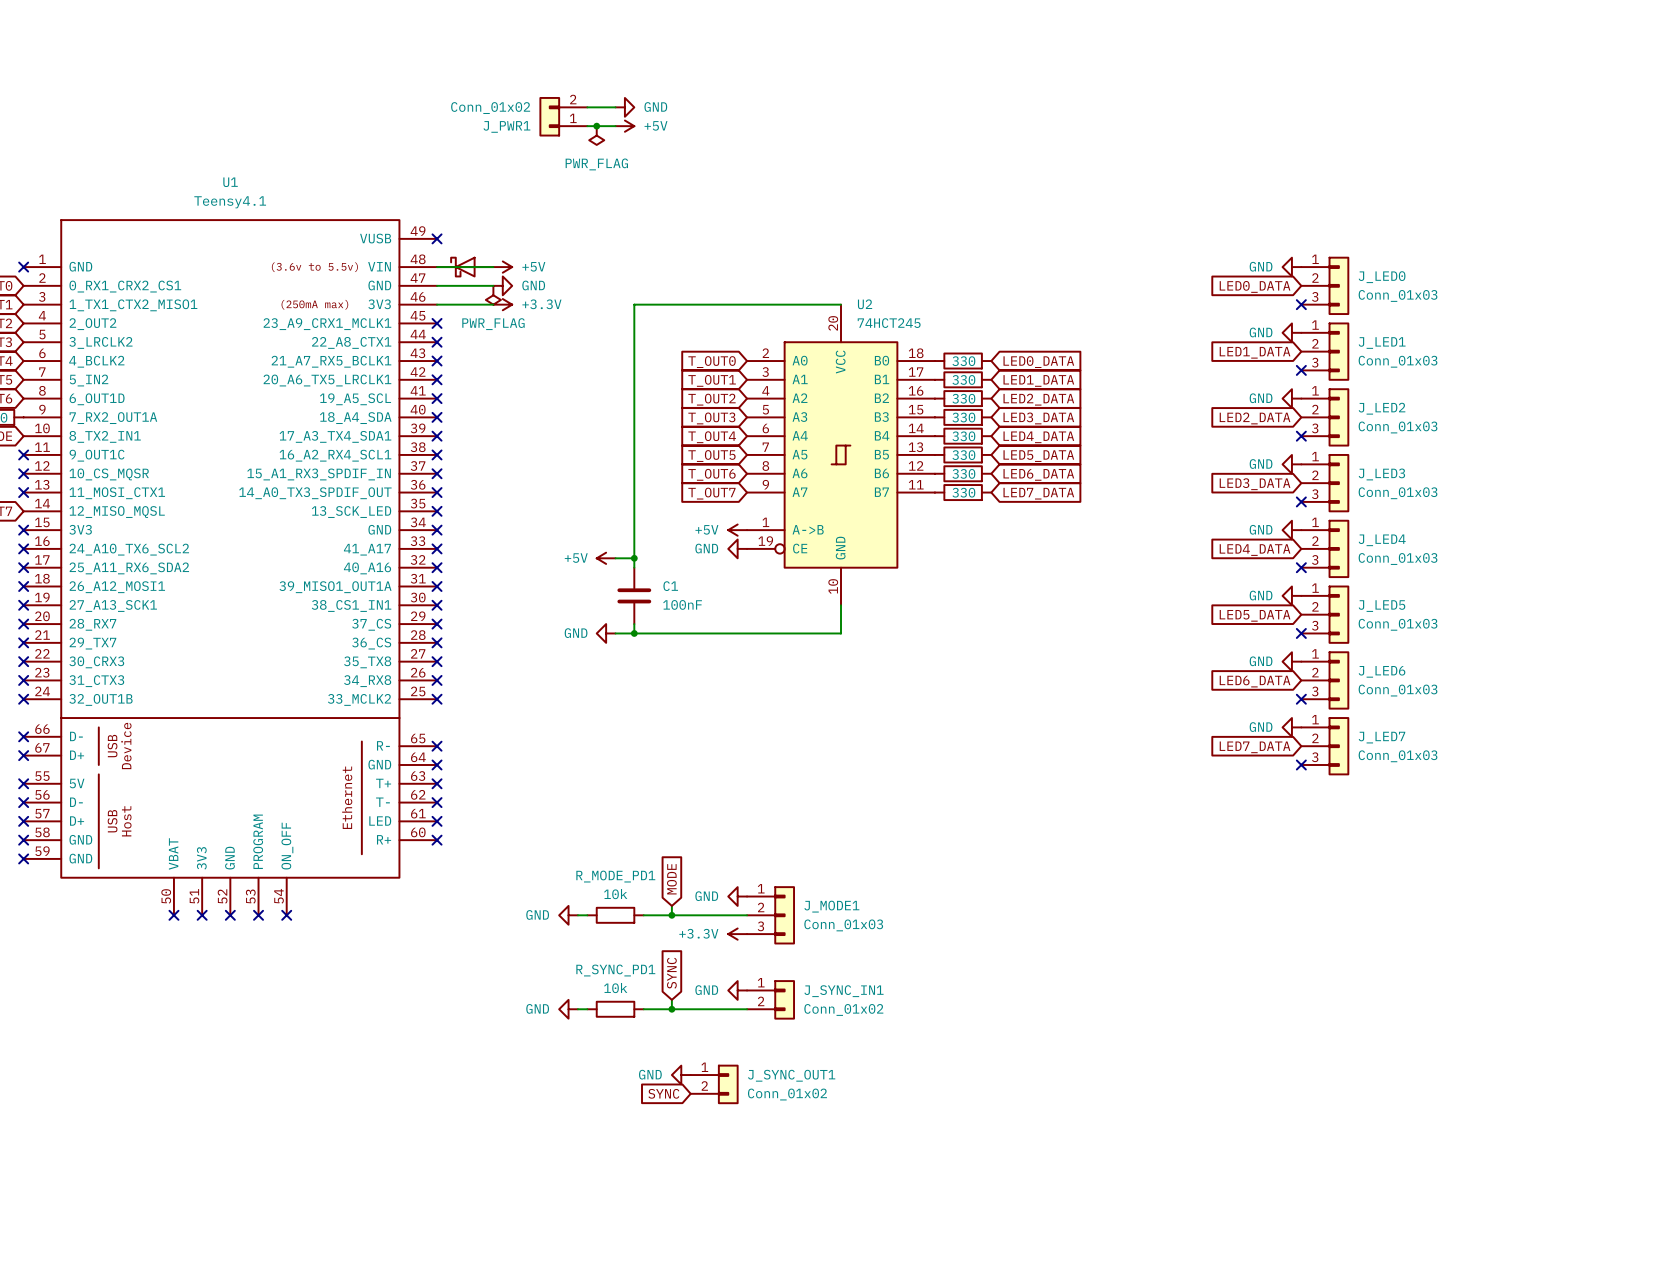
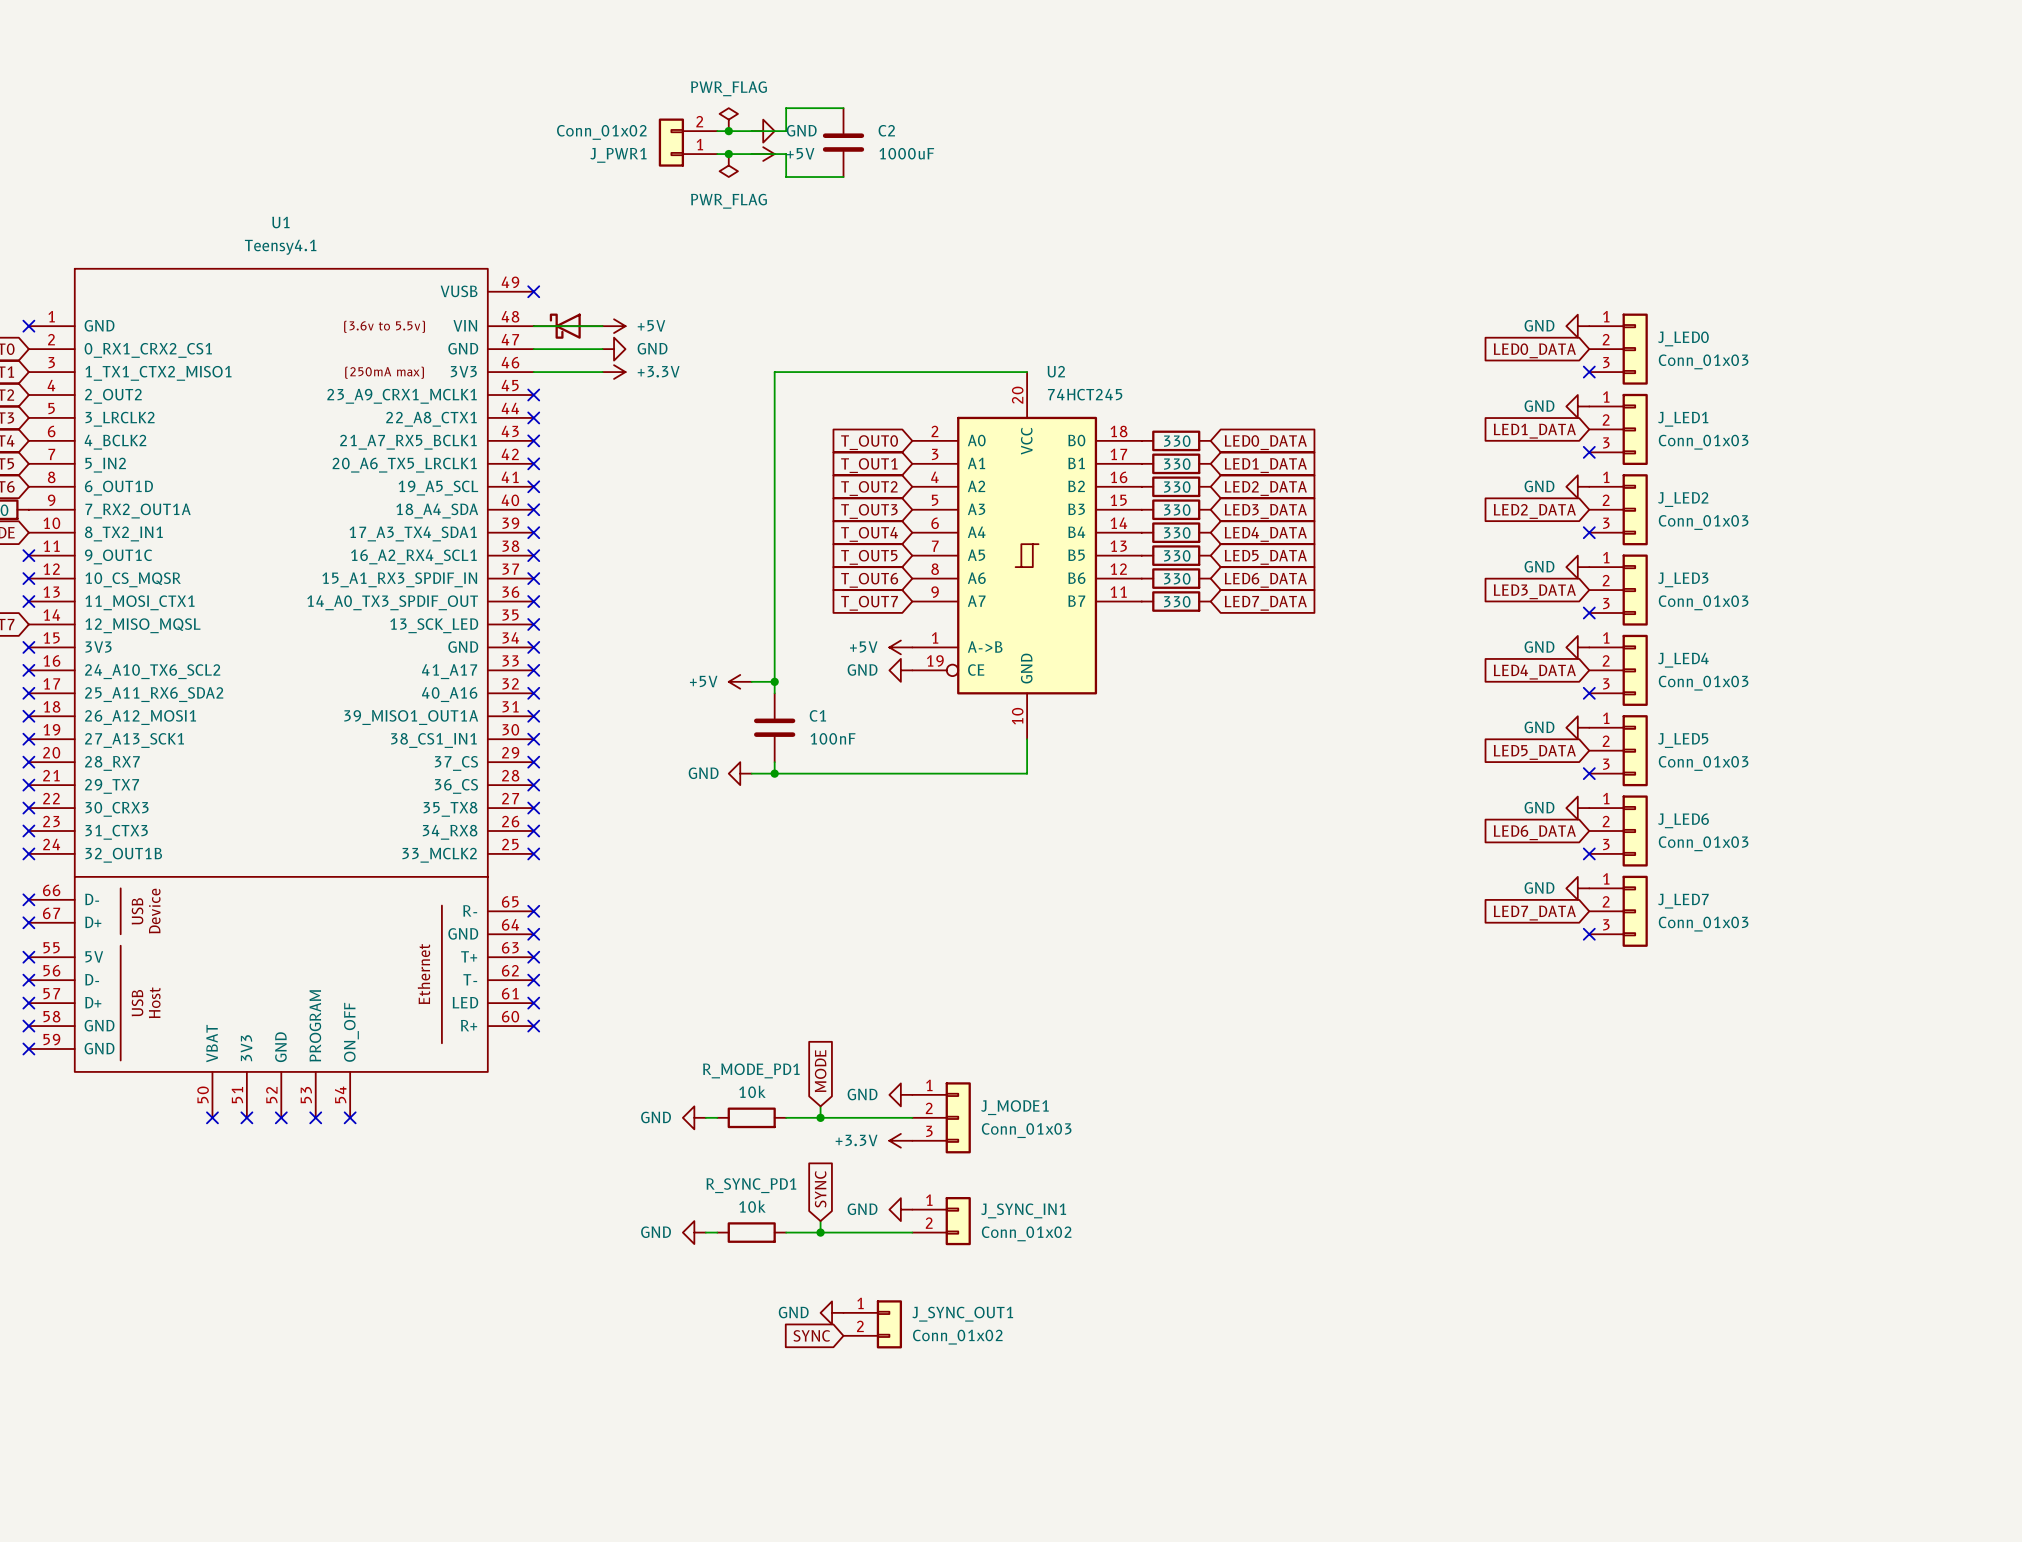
wire: none -> (843, 108) (786, 108) (786, 131) (751, 131)
power symbol: none -> PWR_FLAG (728, 119)
junction: none -> (728, 131)
C2: none -> 1000uF (843, 142)
wire: none -> (751, 154) (786, 154) (786, 177) (843, 177)
power symbol: PWR_FLAG (493, 295) -> none

